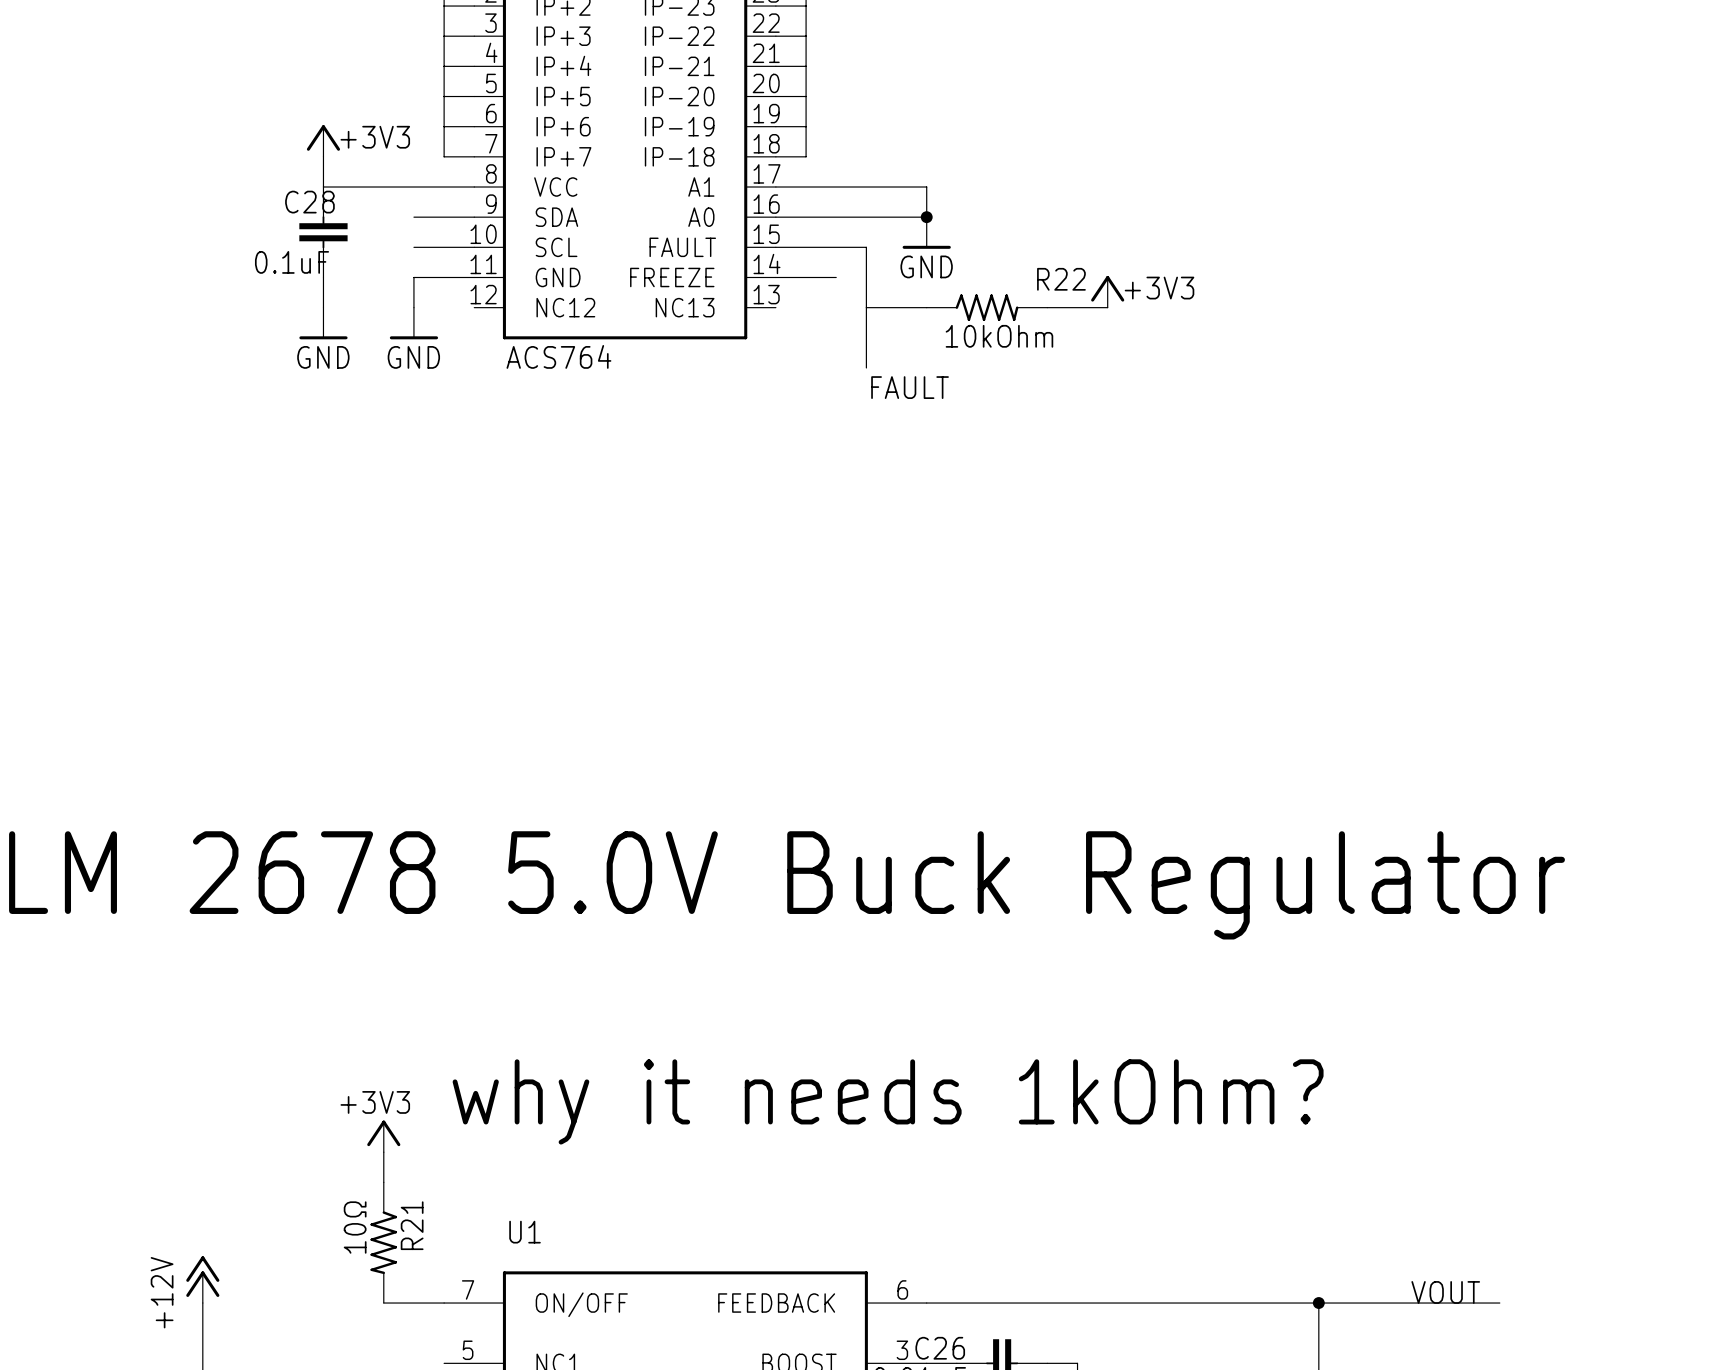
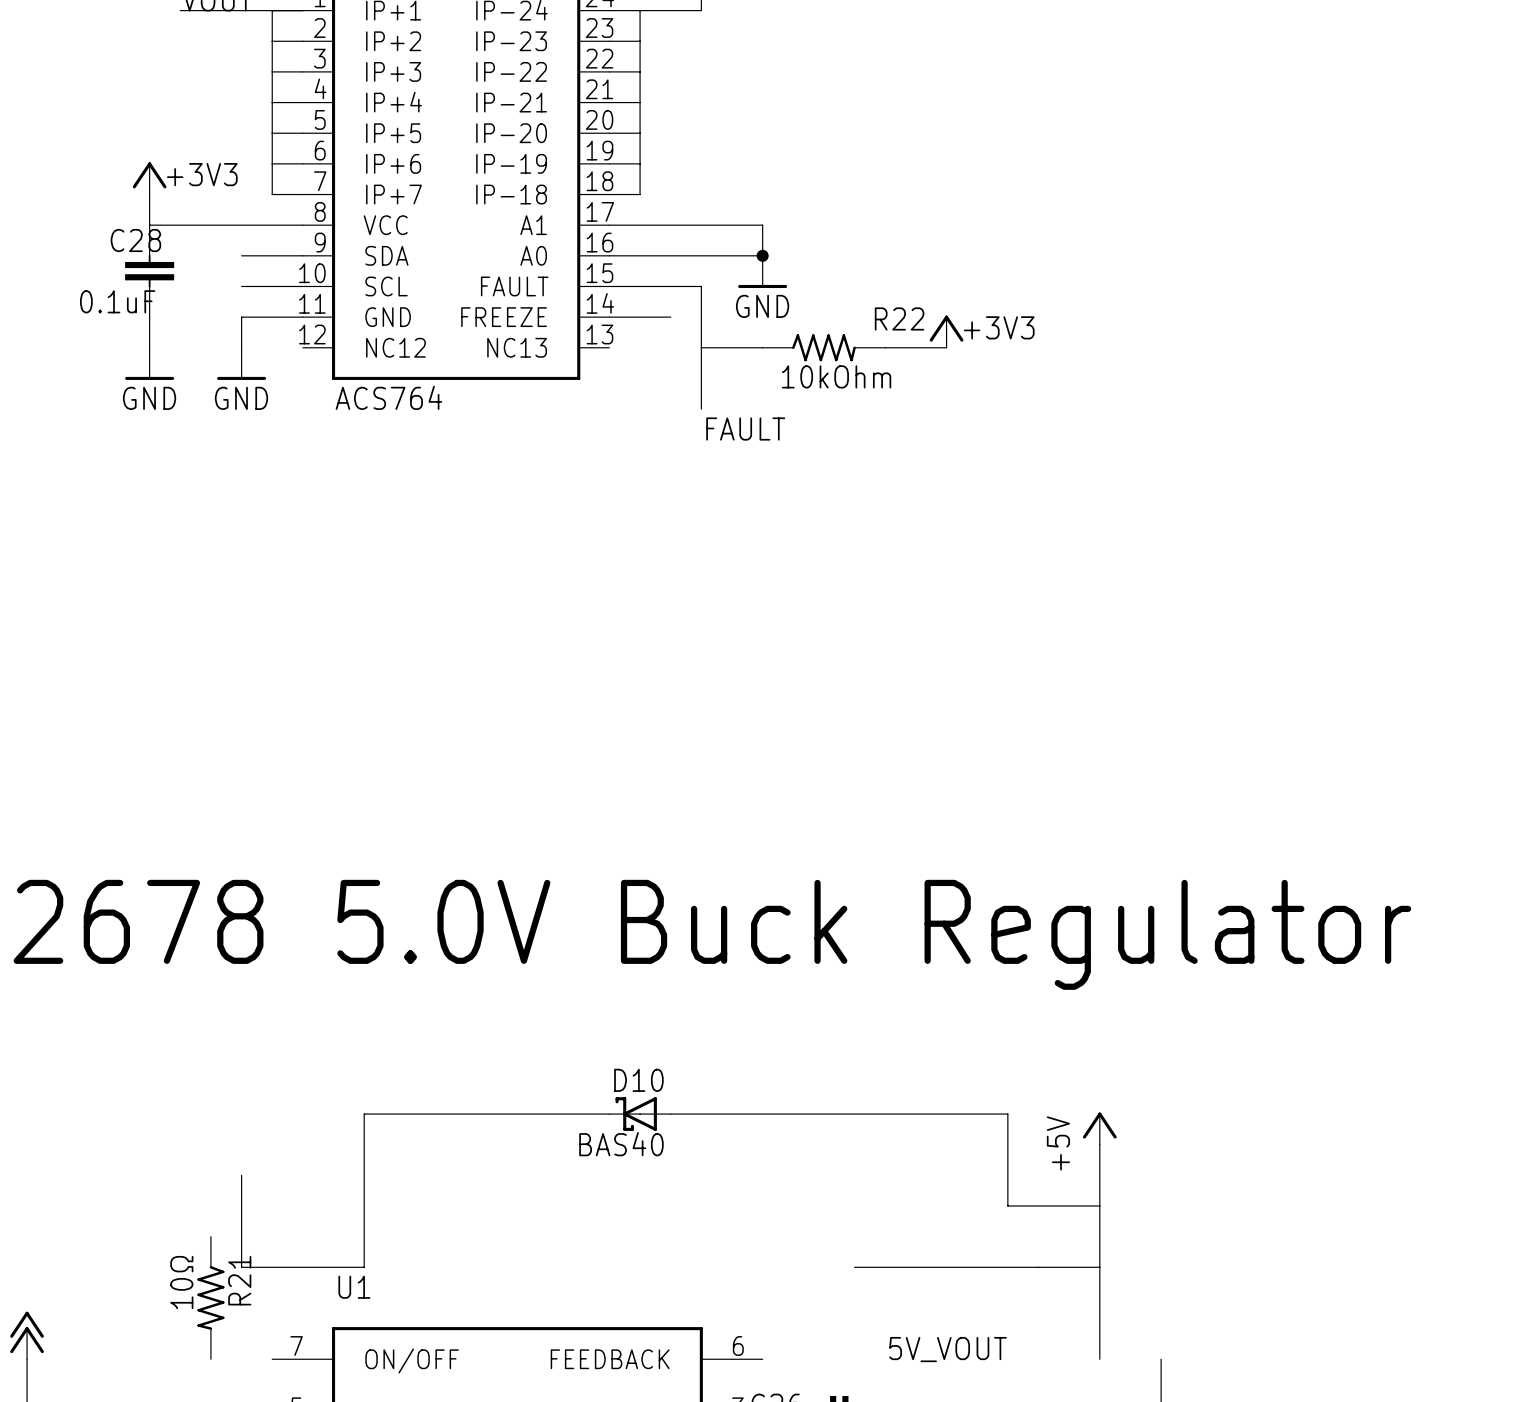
wire: none -> (609, 1114) (364, 1114) (364, 1267) (241, 1267) (241, 1175)
D10: none -> BAS40 (640, 1114)
wire: none -> (670, 1114) (1007, 1114) (1007, 1206) (1099, 1206)
power symbol: none -> +5V (1099, 1128)
wire: none -> (1099, 1144) (1099, 1359)
text: why it needs 1kOhm? (888, 1101) -> none
power symbol: +3V3 (383, 1136) -> none
wire: (383, 1152) (383, 1182) -> none
wire: none -> (854, 1267) (1099, 1267)
label: VOUT (1445, 1292) -> none
label: none -> 5V_VOUT (948, 1349)
wire: (383, 1303) (444, 1303) -> none
wire: (926, 1303) (1499, 1303) -> none
junction: (1318, 1303) -> none

